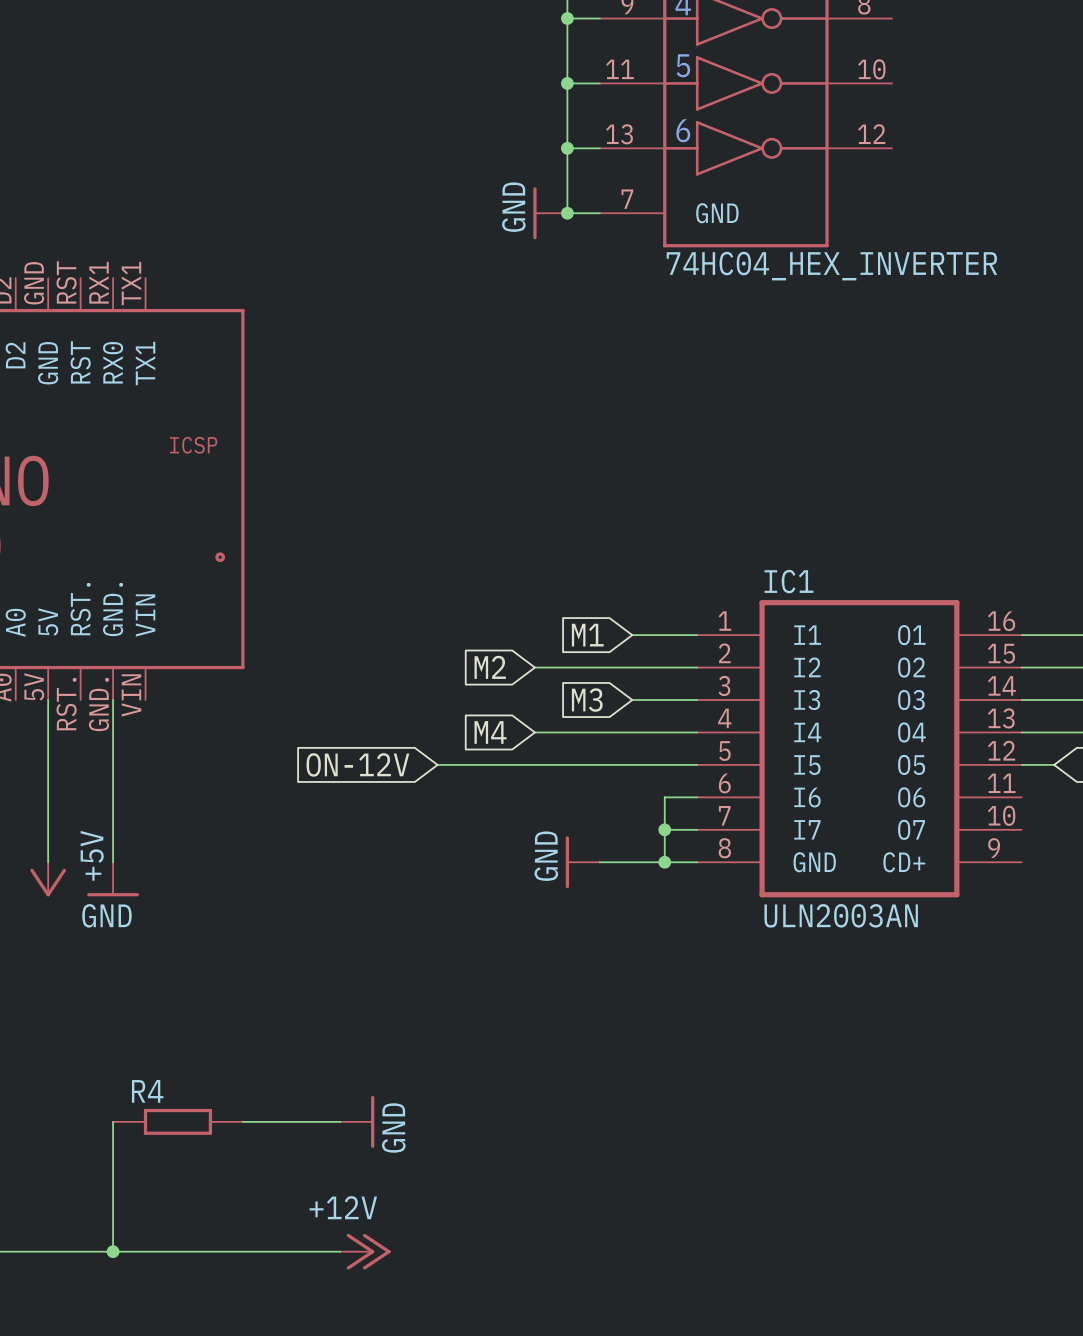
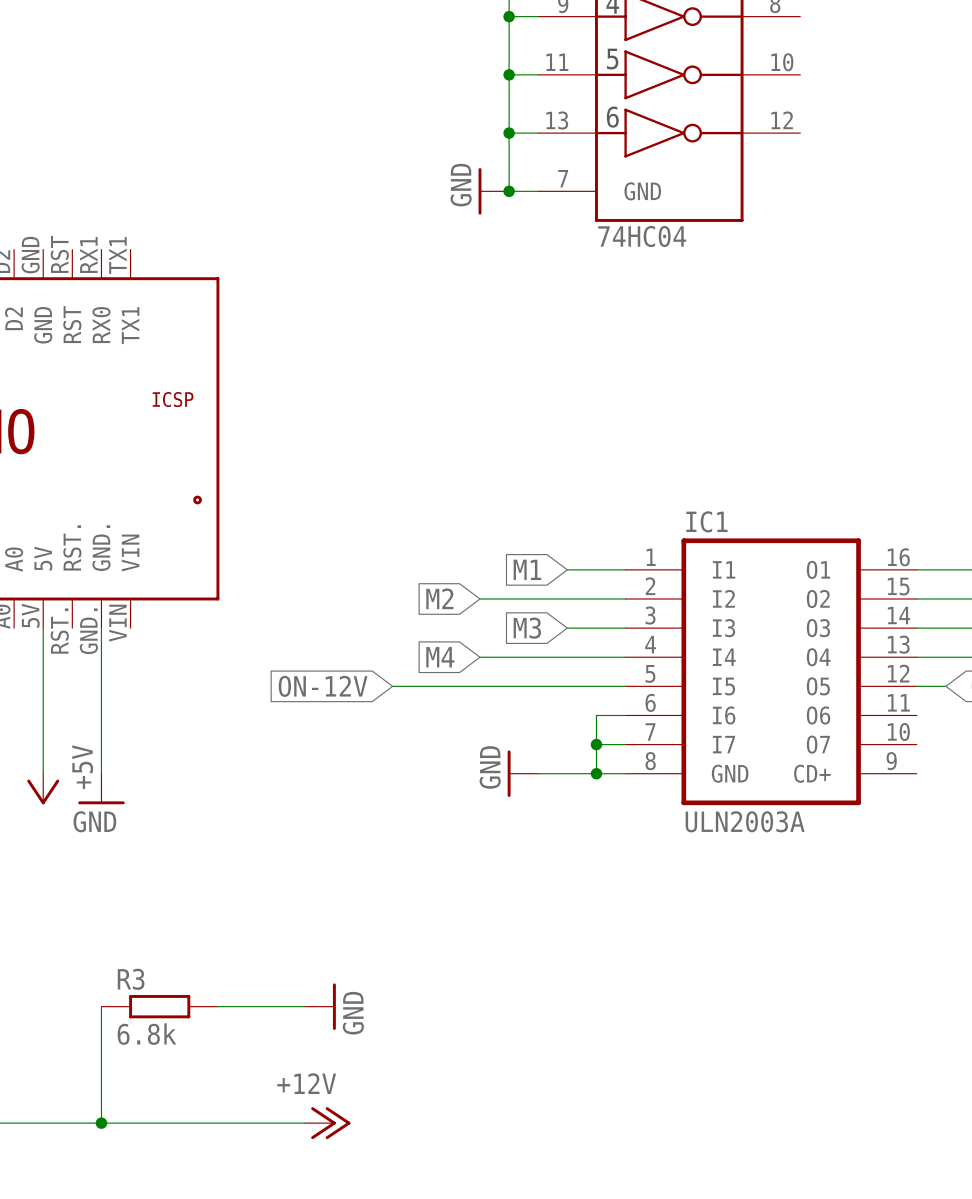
part value: 74HC04_HEX_INVERTER (831, 266) -> 74HC04 (642, 236)
IC1 value: ULN2003AN (841, 915) -> ULN2003A (745, 821)
R4 name: R4 (147, 1091) -> R3 (131, 979)
R4 value: none -> 6.8k (146, 1034)

